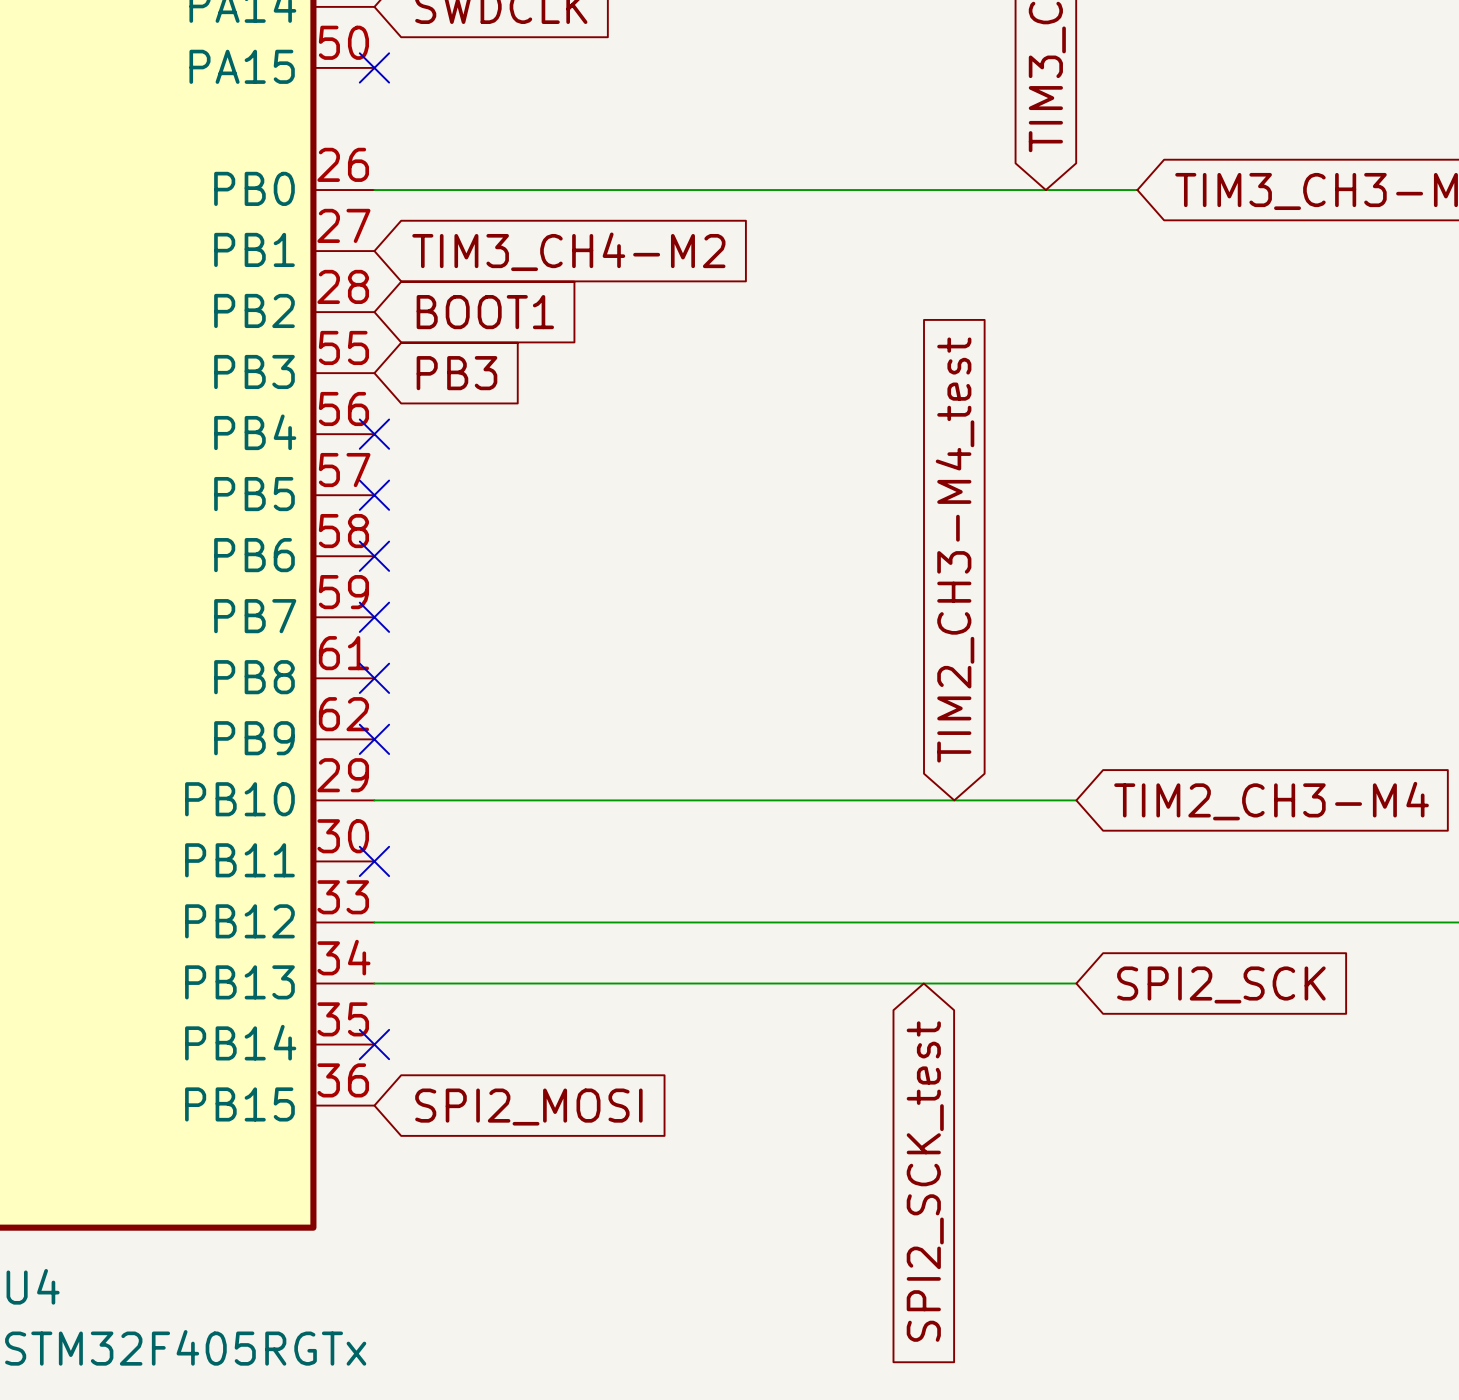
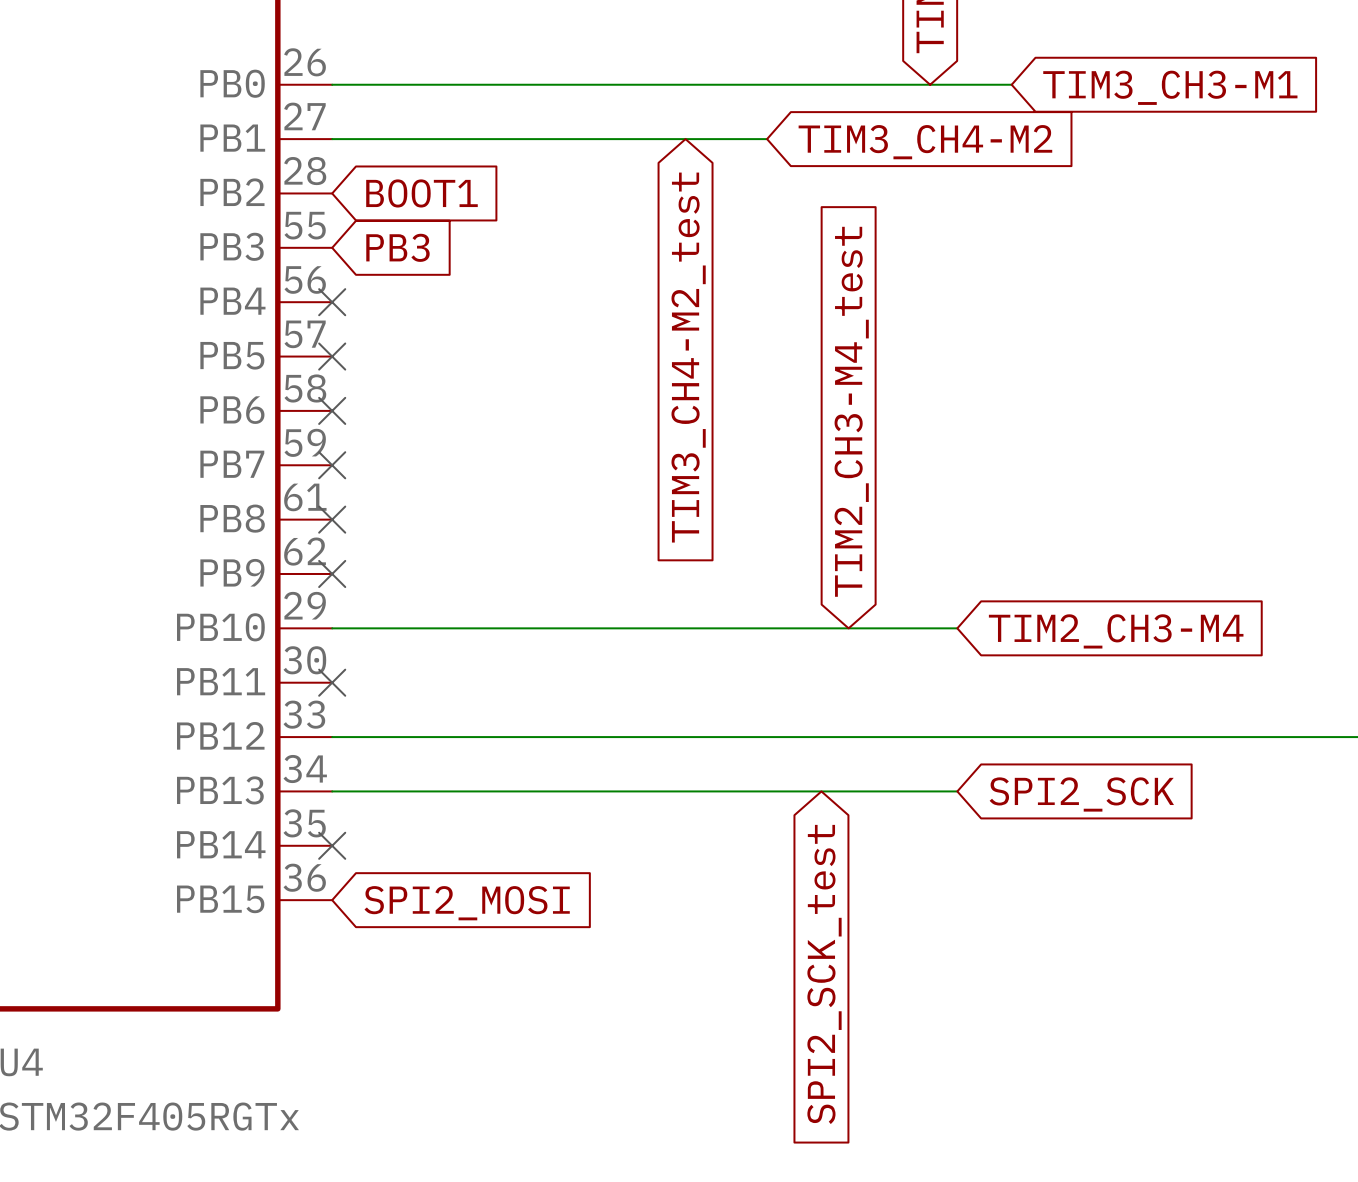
wire: none -> (332, 139) (767, 139)
global label position: TIM3_CH4-M2 (568, 251) -> TIM3_CH4-M2 (925, 142)
global label: none -> TIM3_CH4-M2_test (688, 357)

